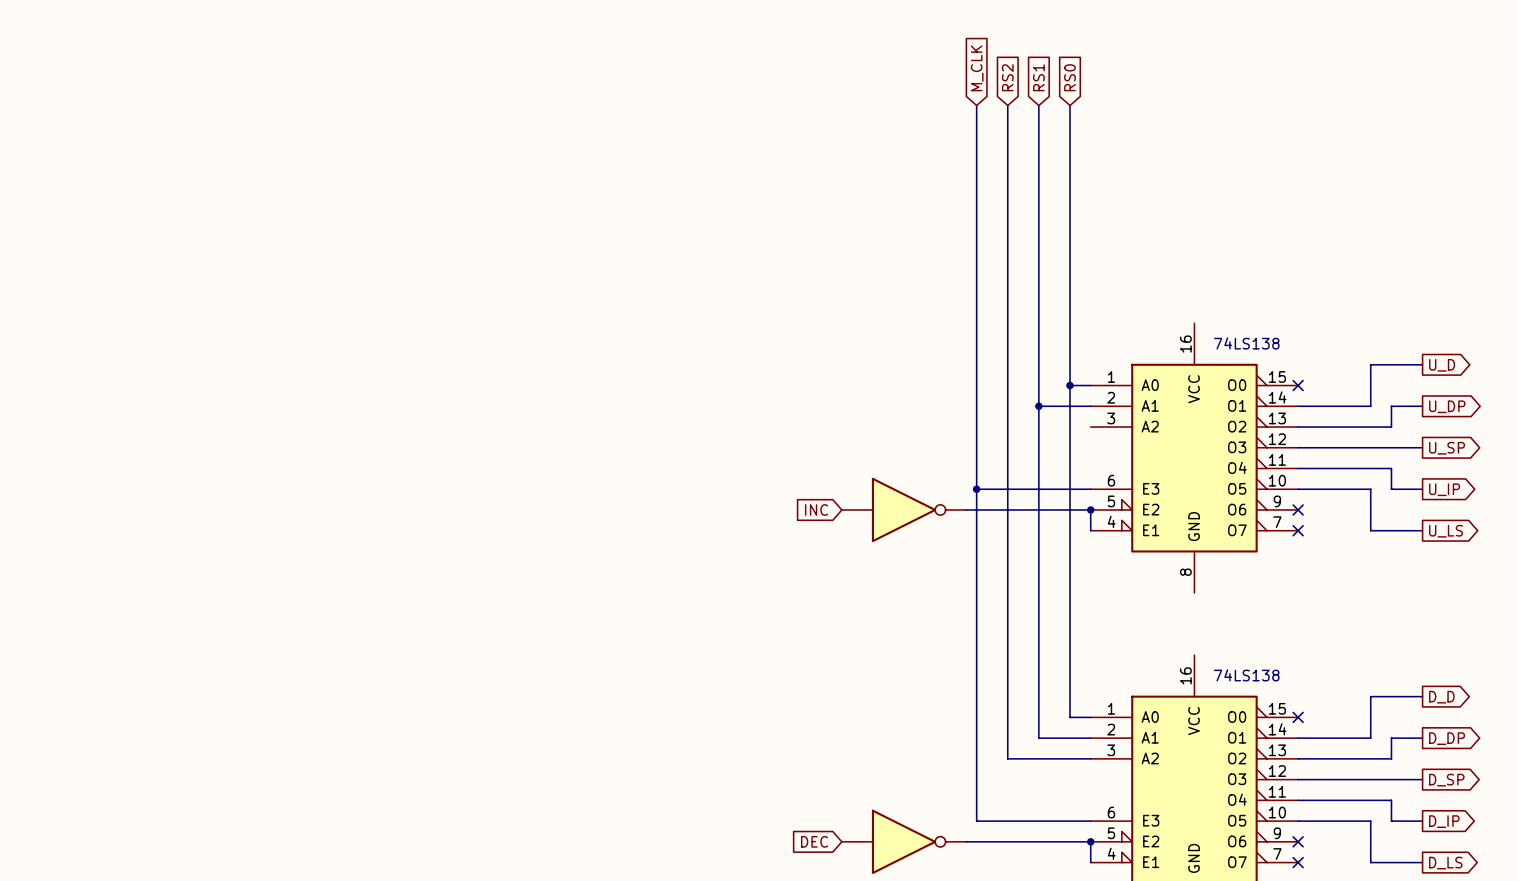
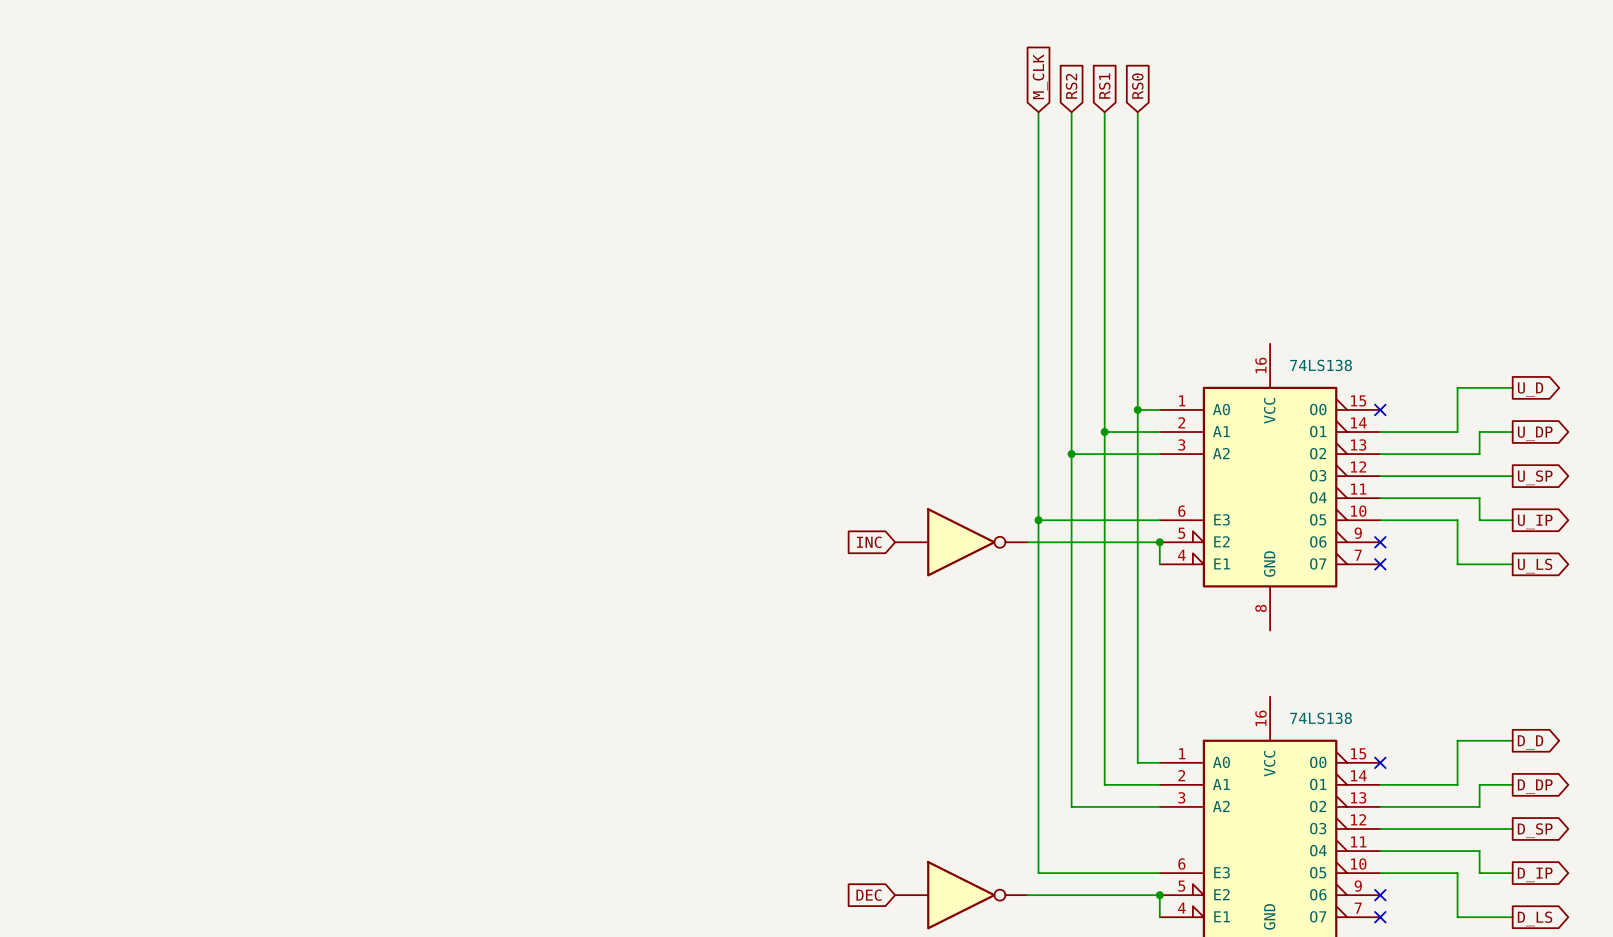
wire: none -> (1071, 454) (1159, 454)
junction: none -> (1071, 454)

